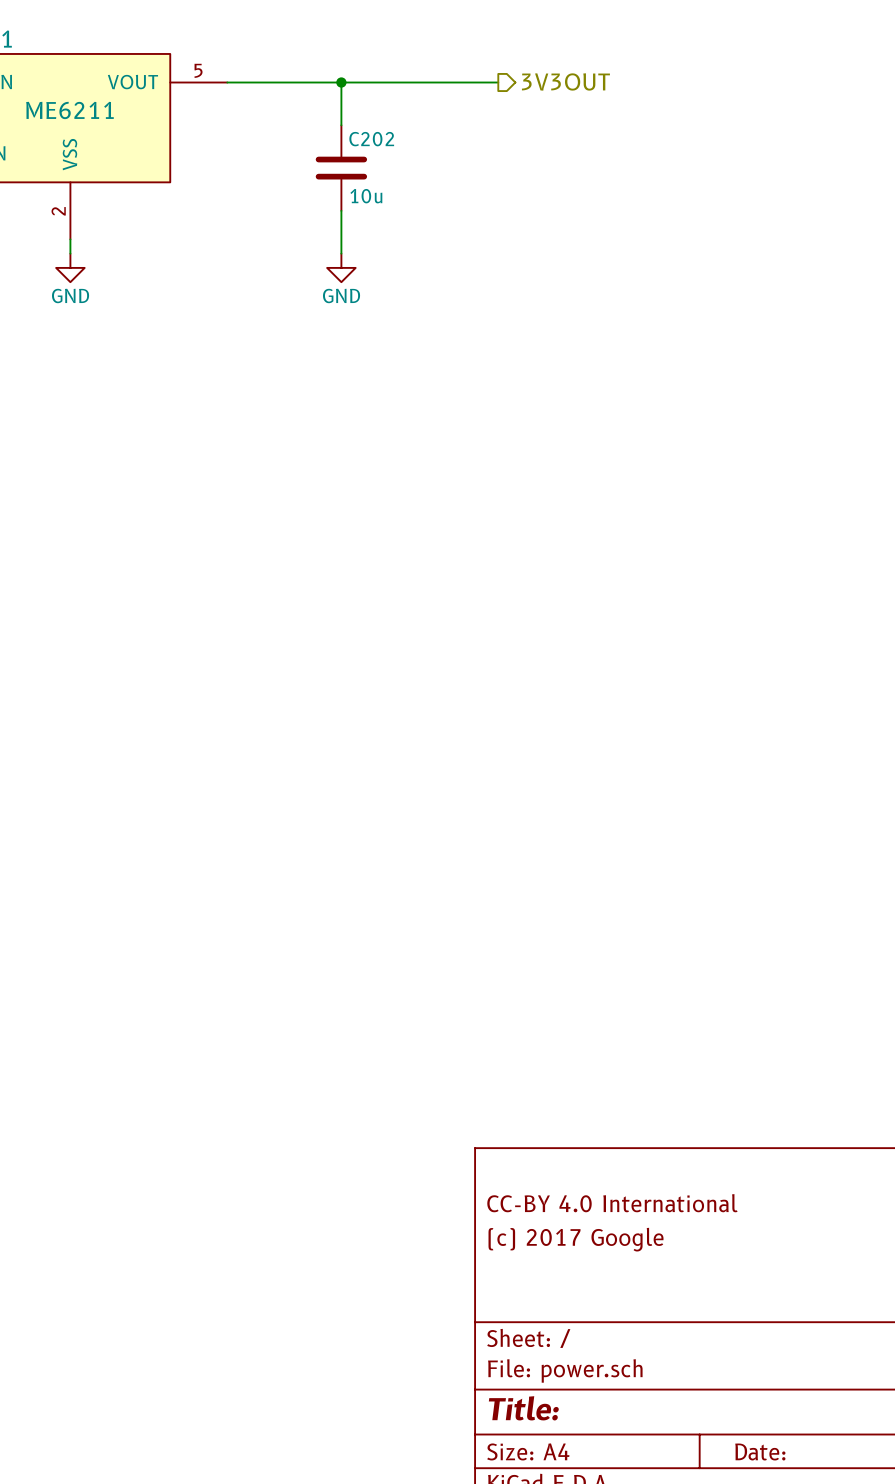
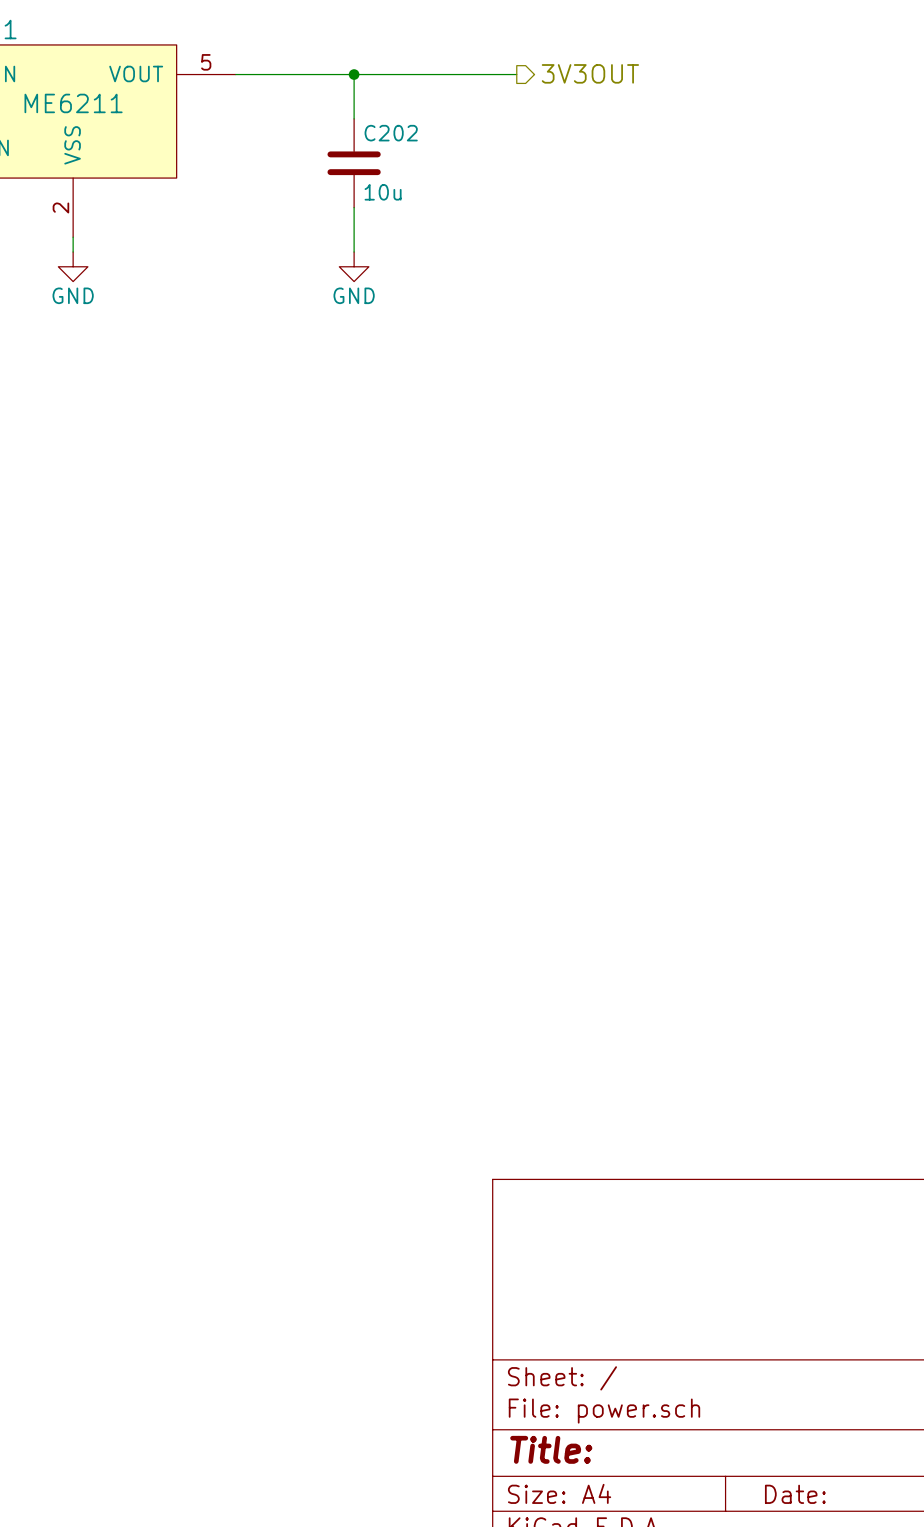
title block: CC-BY 4.0 International (612, 1203) -> none
title block: (c) 2017 Google (576, 1239) -> none

